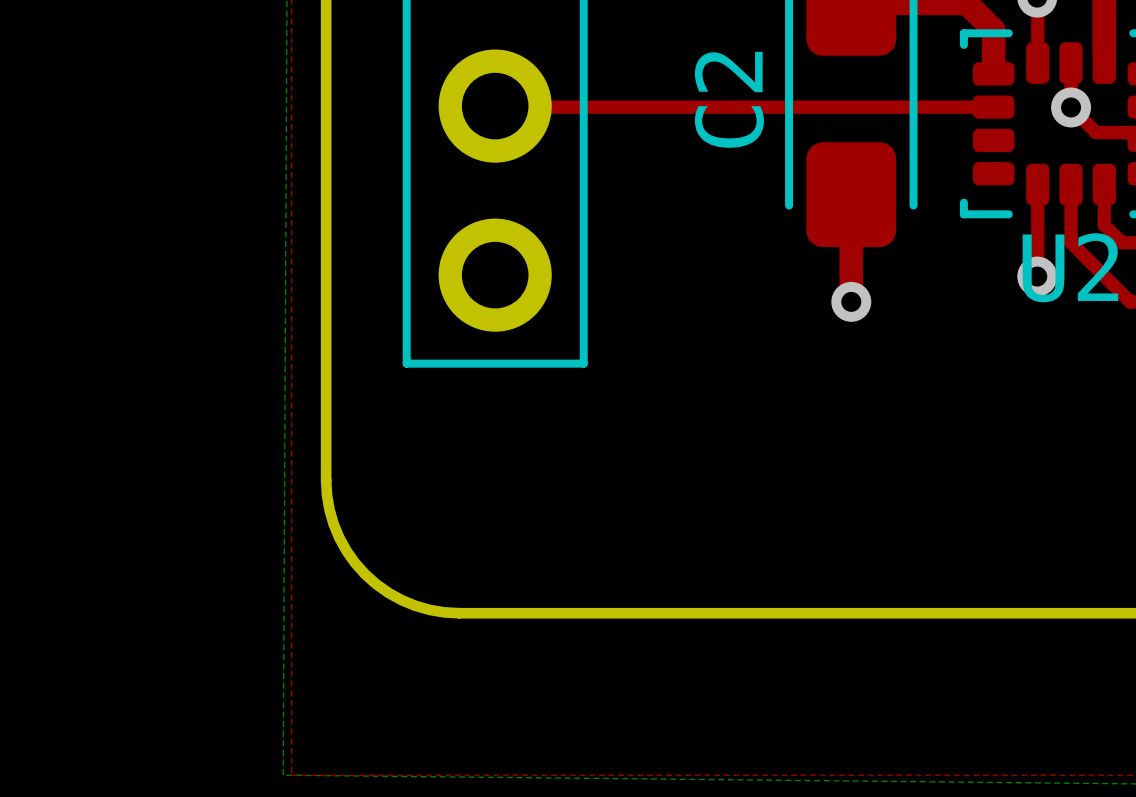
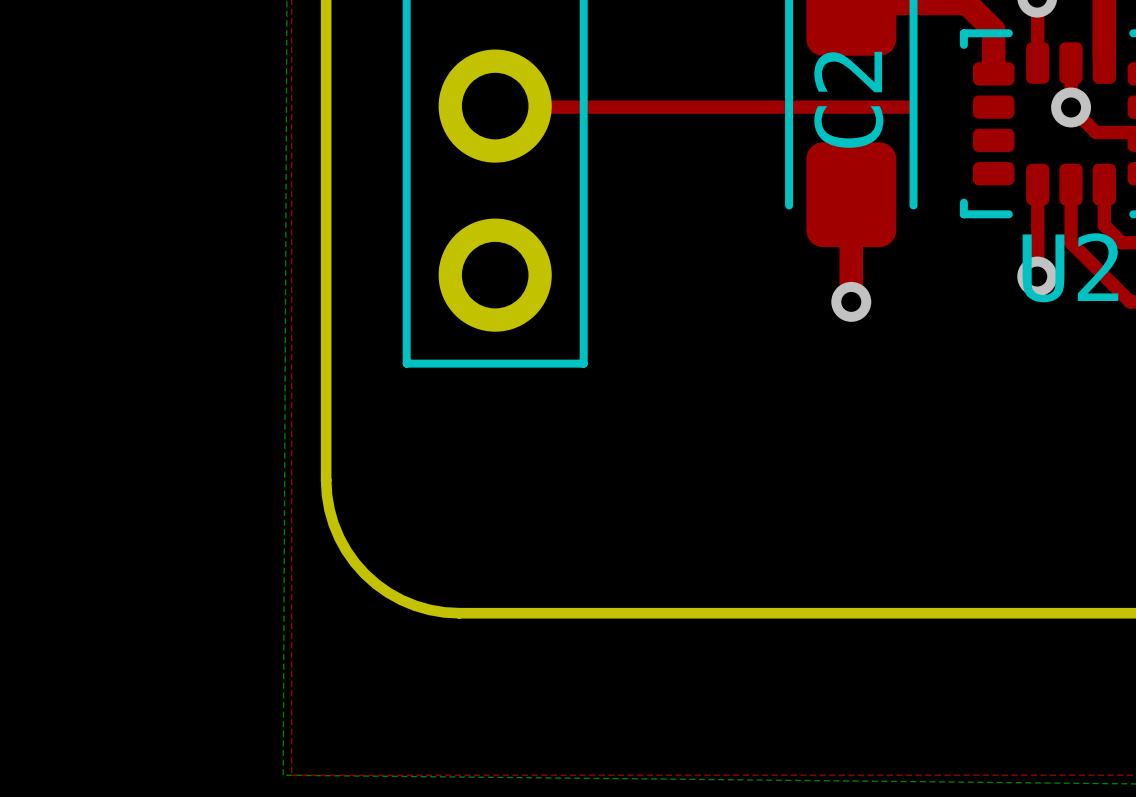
C2 name position: C2 (729, 99) -> C2 (848, 99)
top track: (908, 107) (993, 107) -> none

